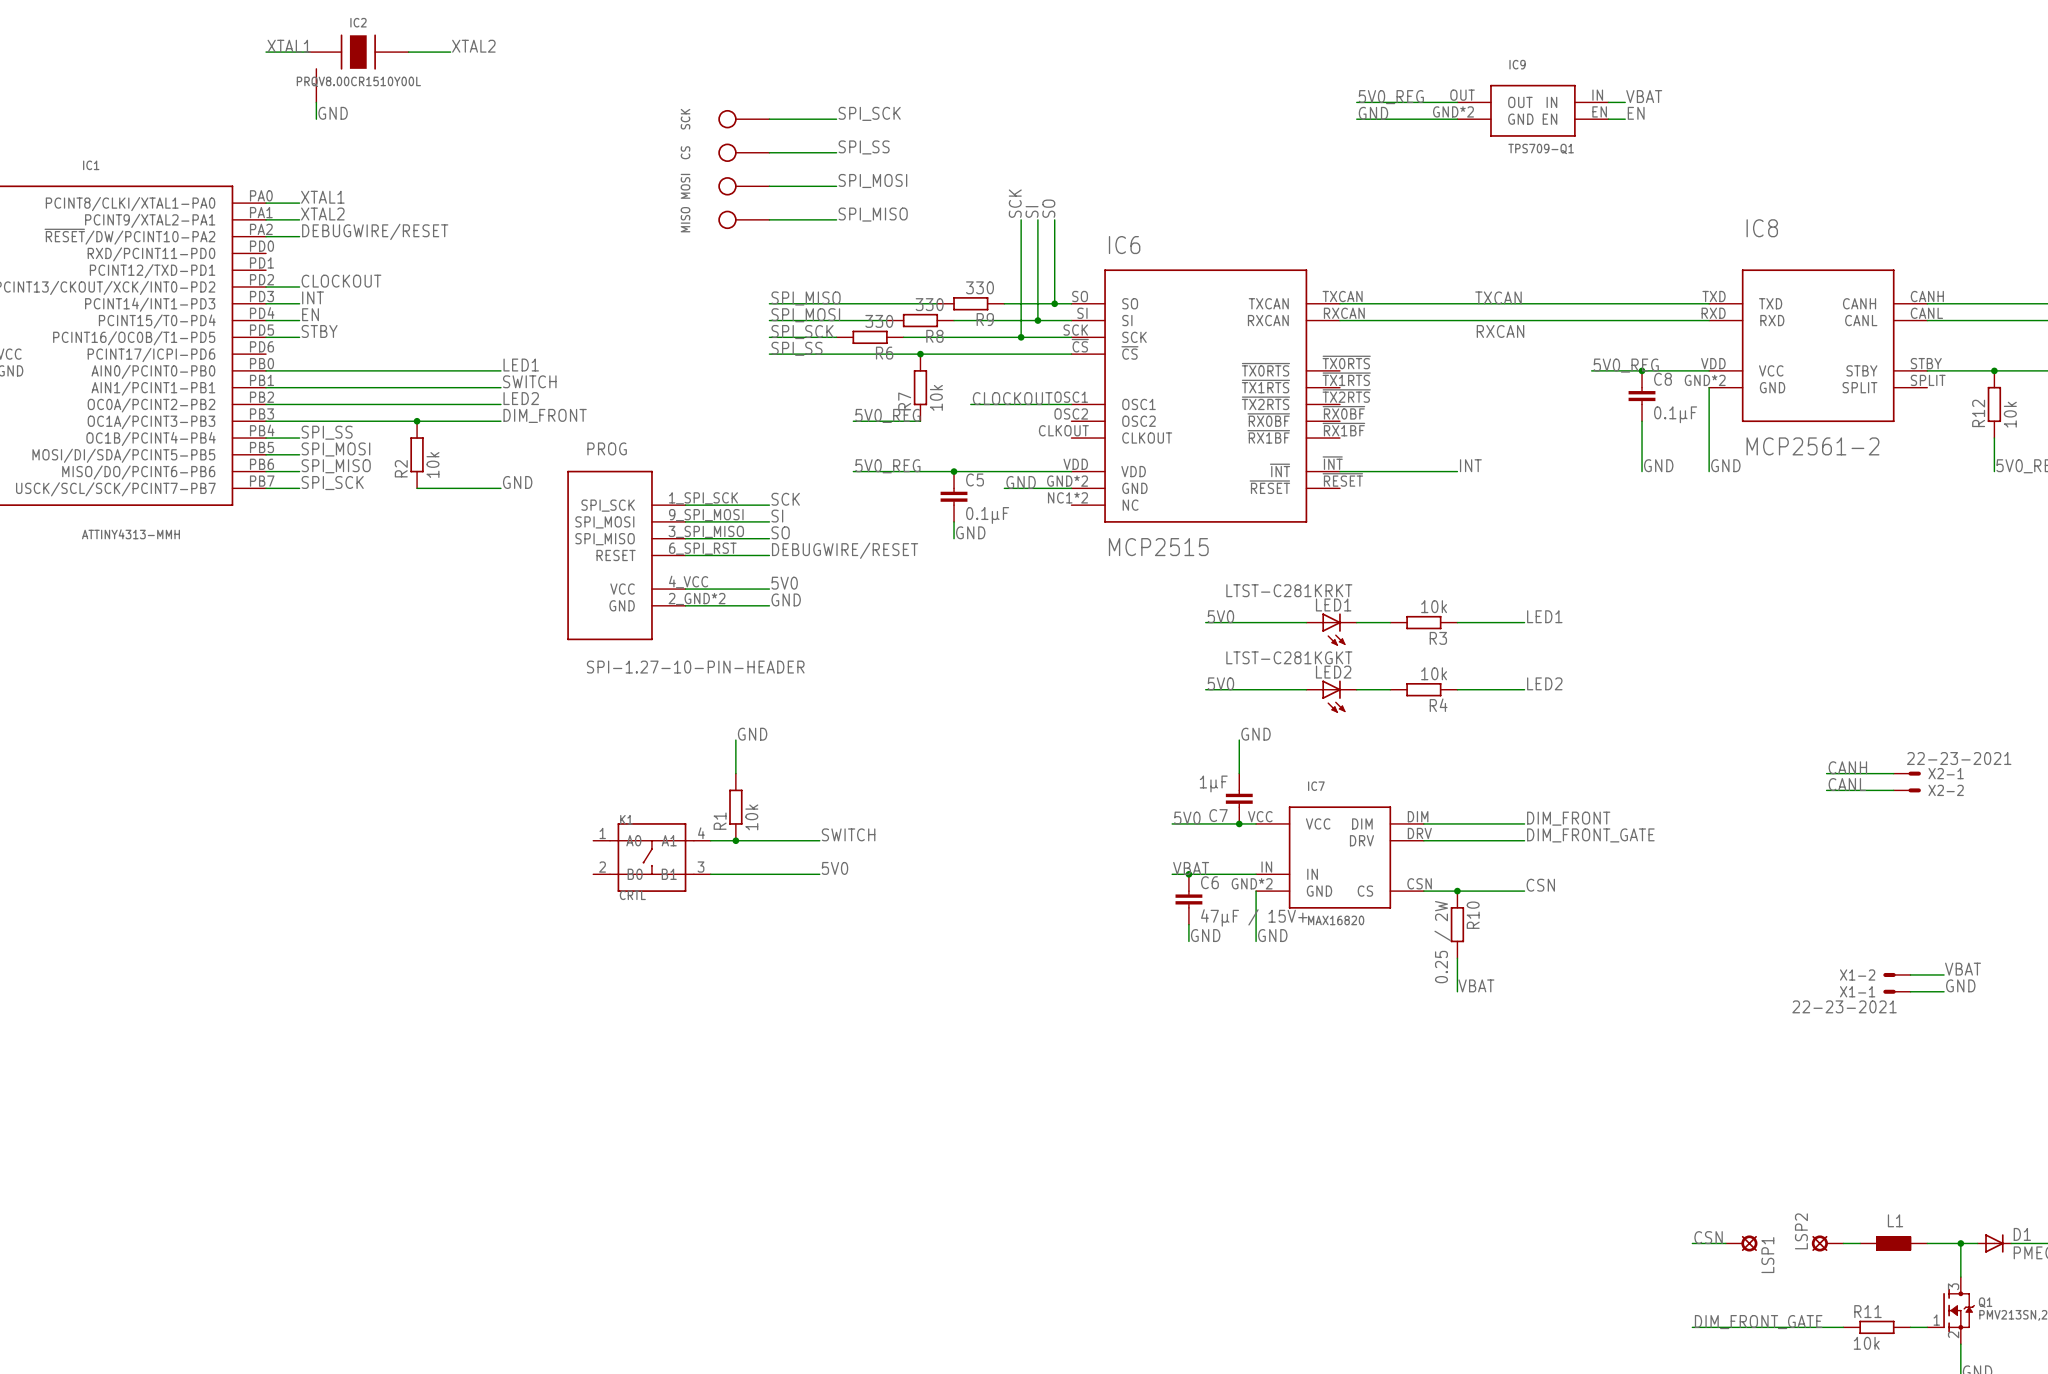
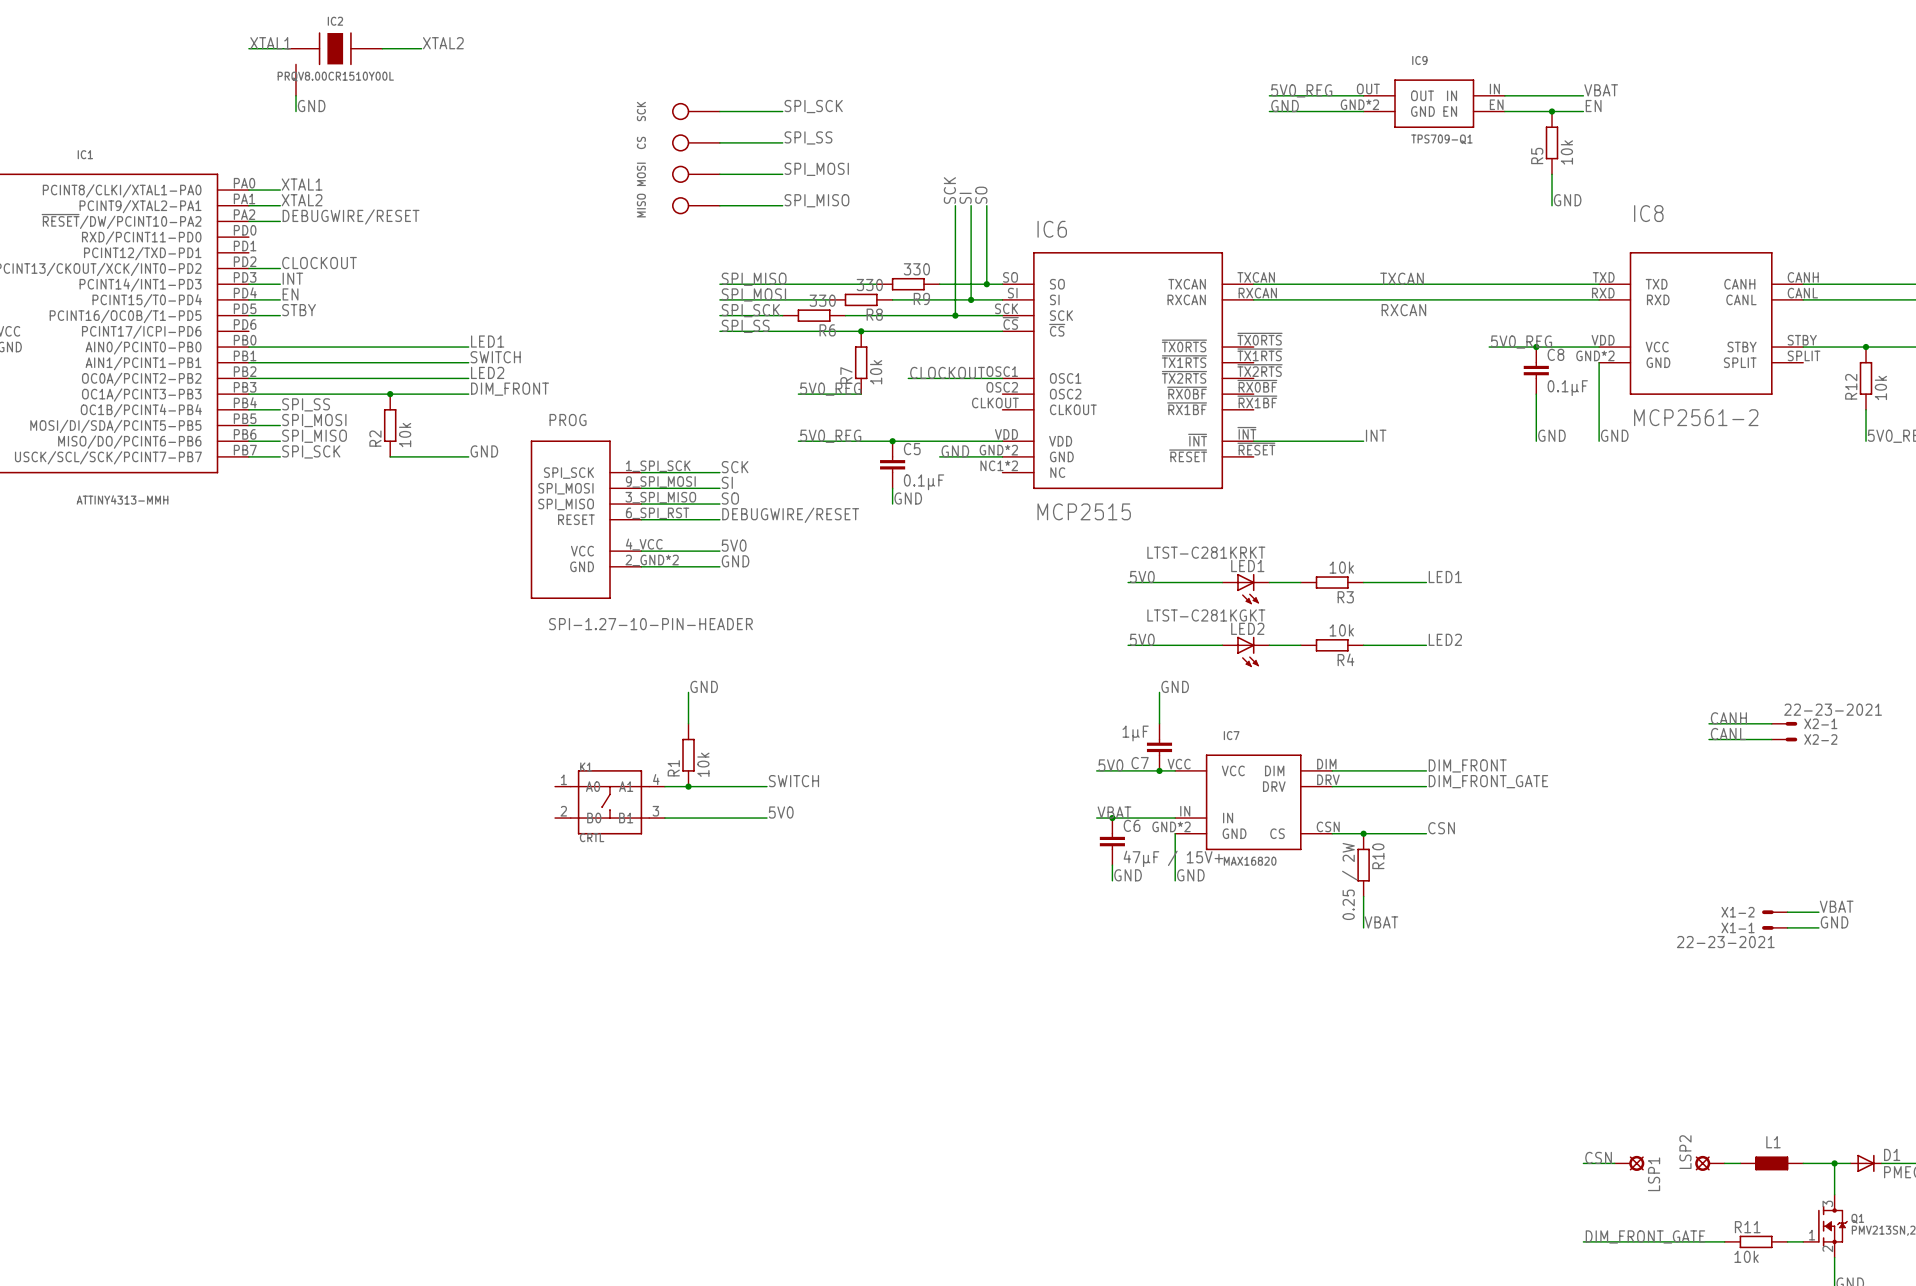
label position: VBAT (1644, 96) -> VBAT (1601, 90)
wire: none -> (1520, 95) (1583, 95)
label position: EN (1636, 113) -> EN (1593, 106)
wire: none -> (1520, 111) (1583, 111)
junction: none -> (1552, 111)
R5: none -> 10k (1552, 142)
wire: none -> (1552, 174) (1552, 205)
label: none -> GND (1567, 200)

